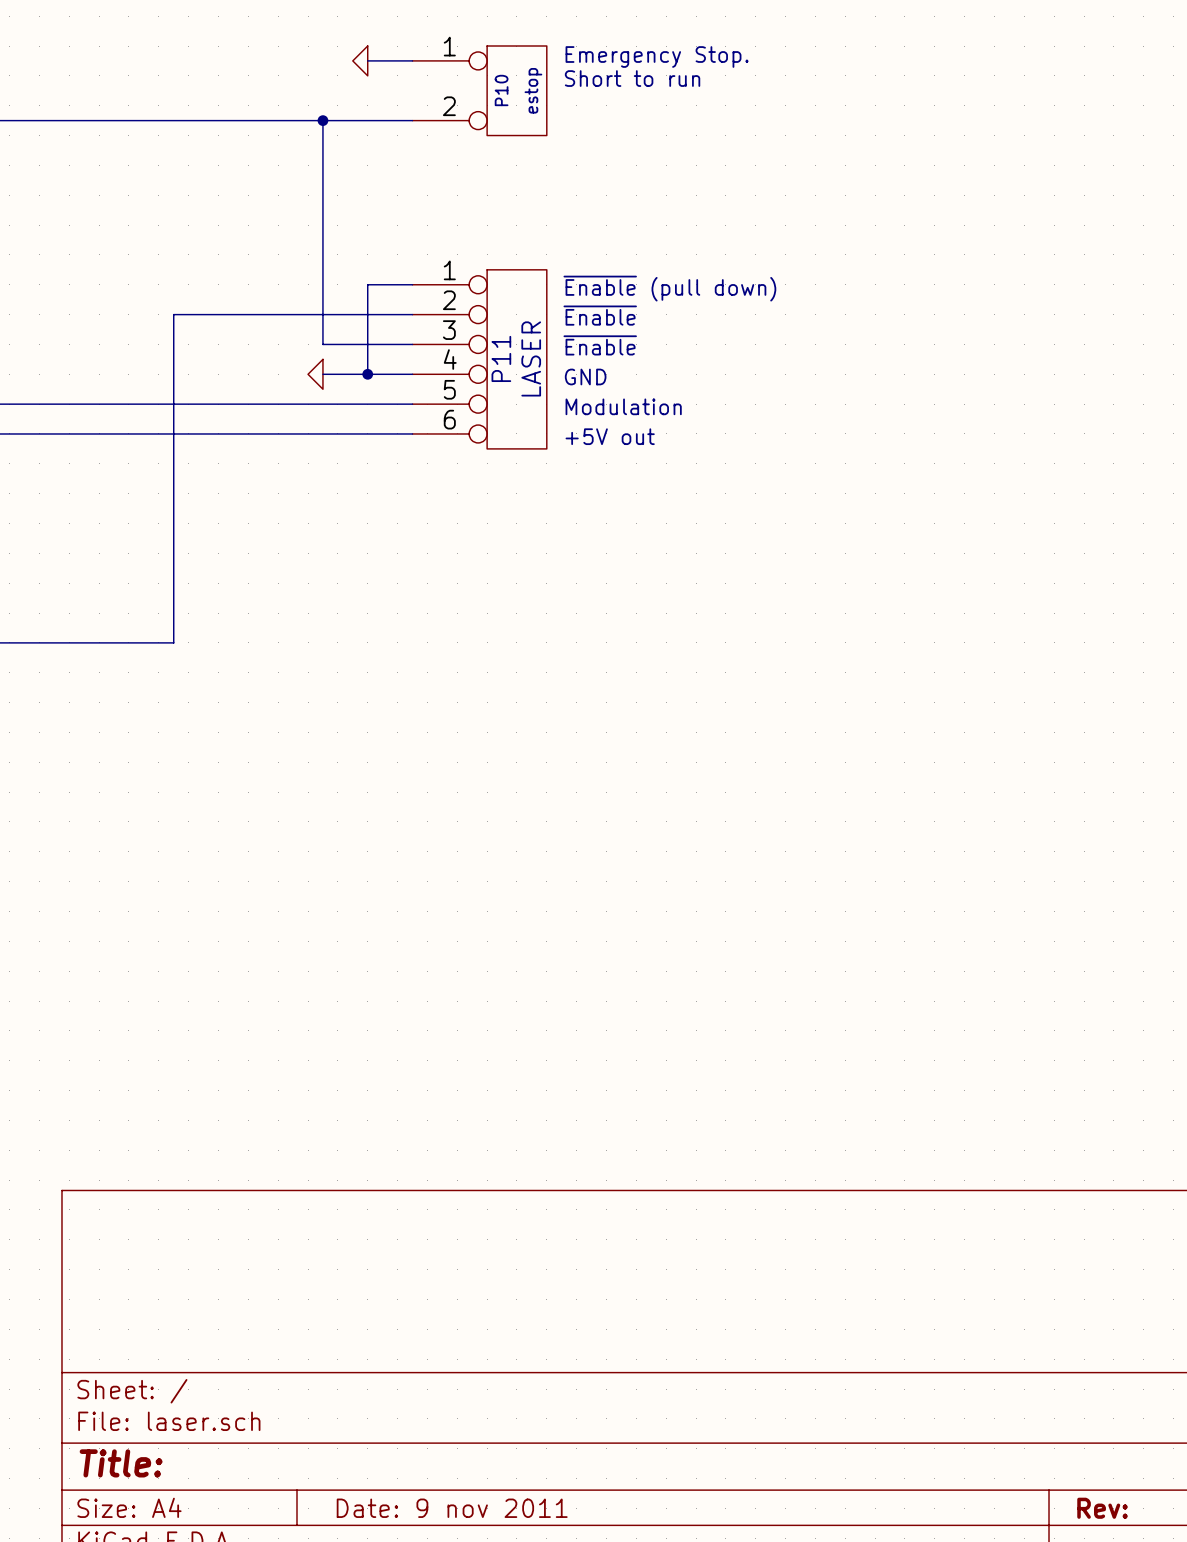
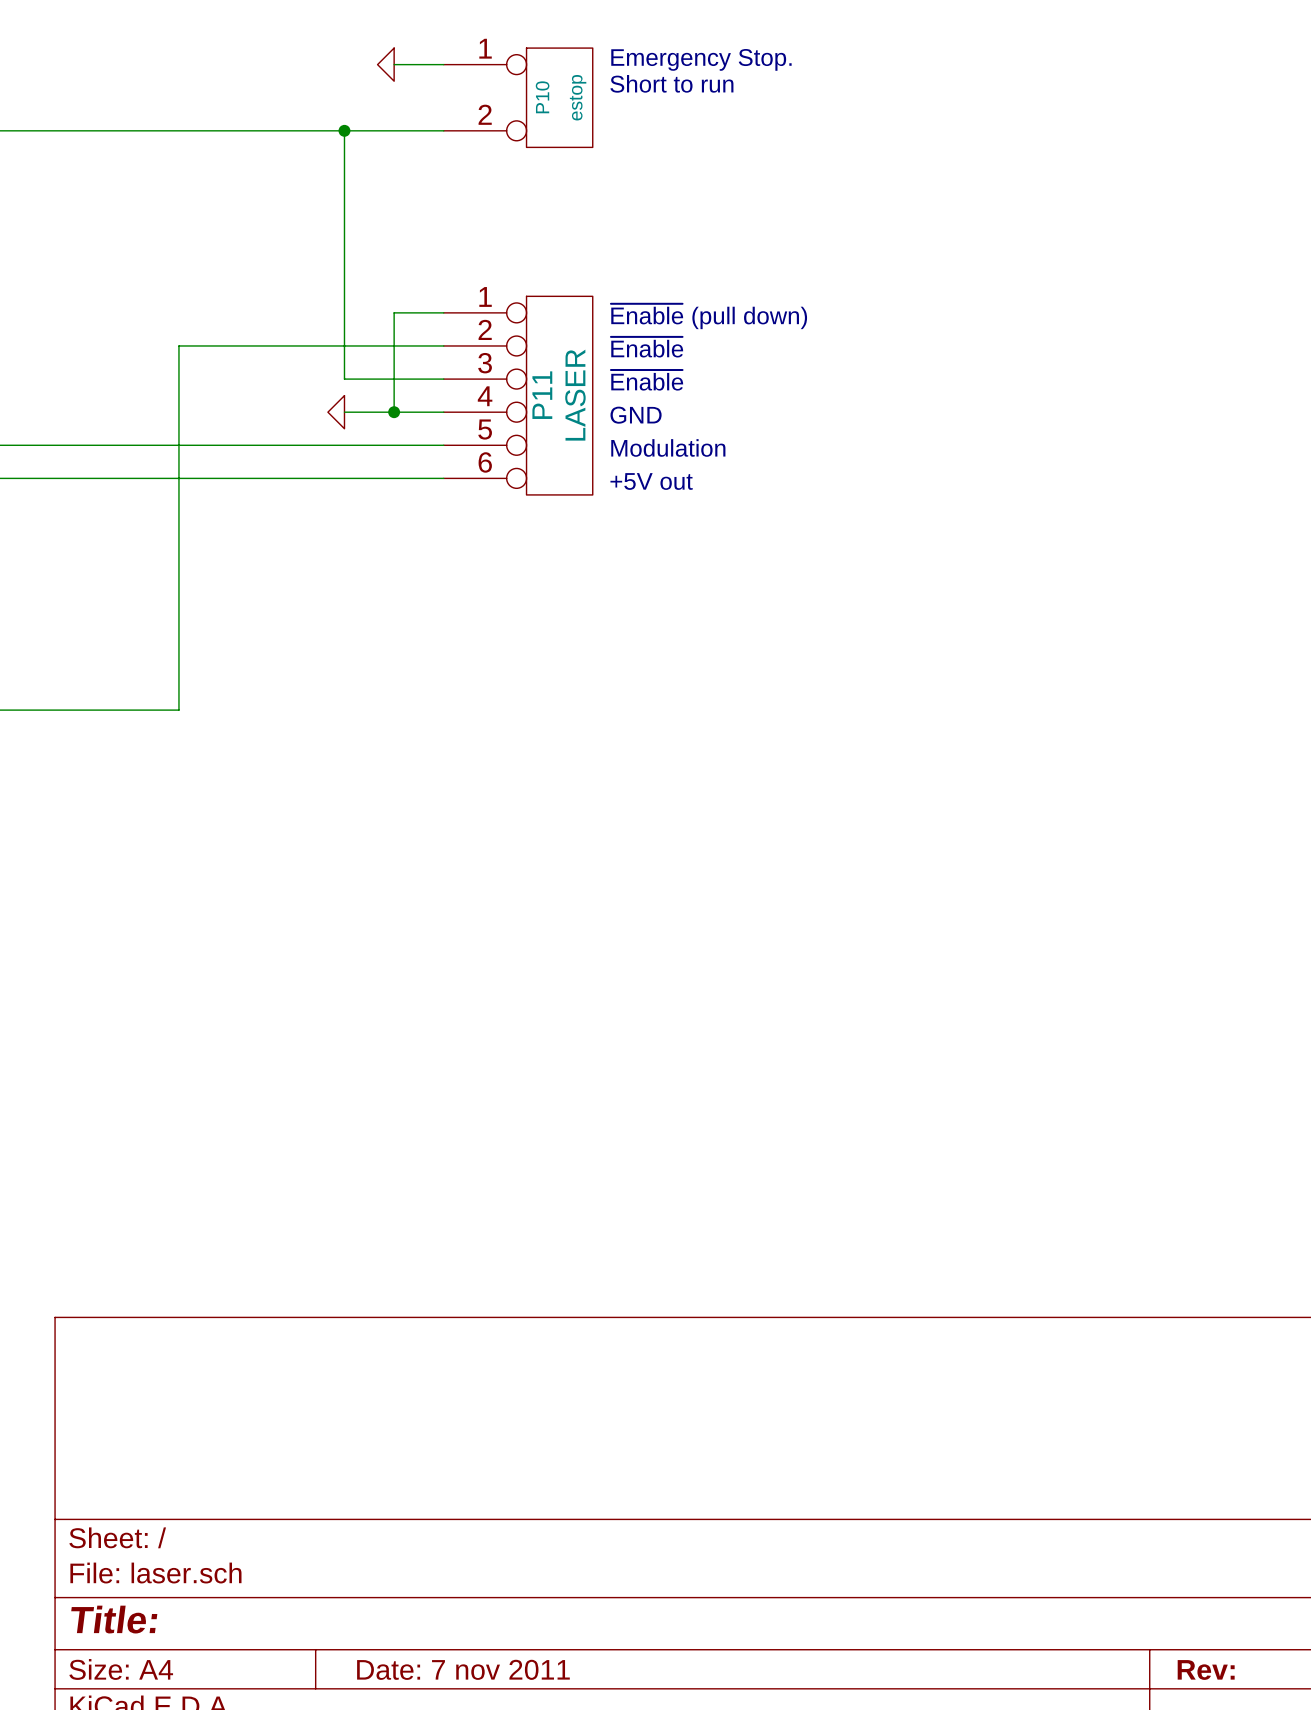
title block: Date: 9 nov 2011 (452, 1508) -> Date: 7 nov 2011 (463, 1669)

